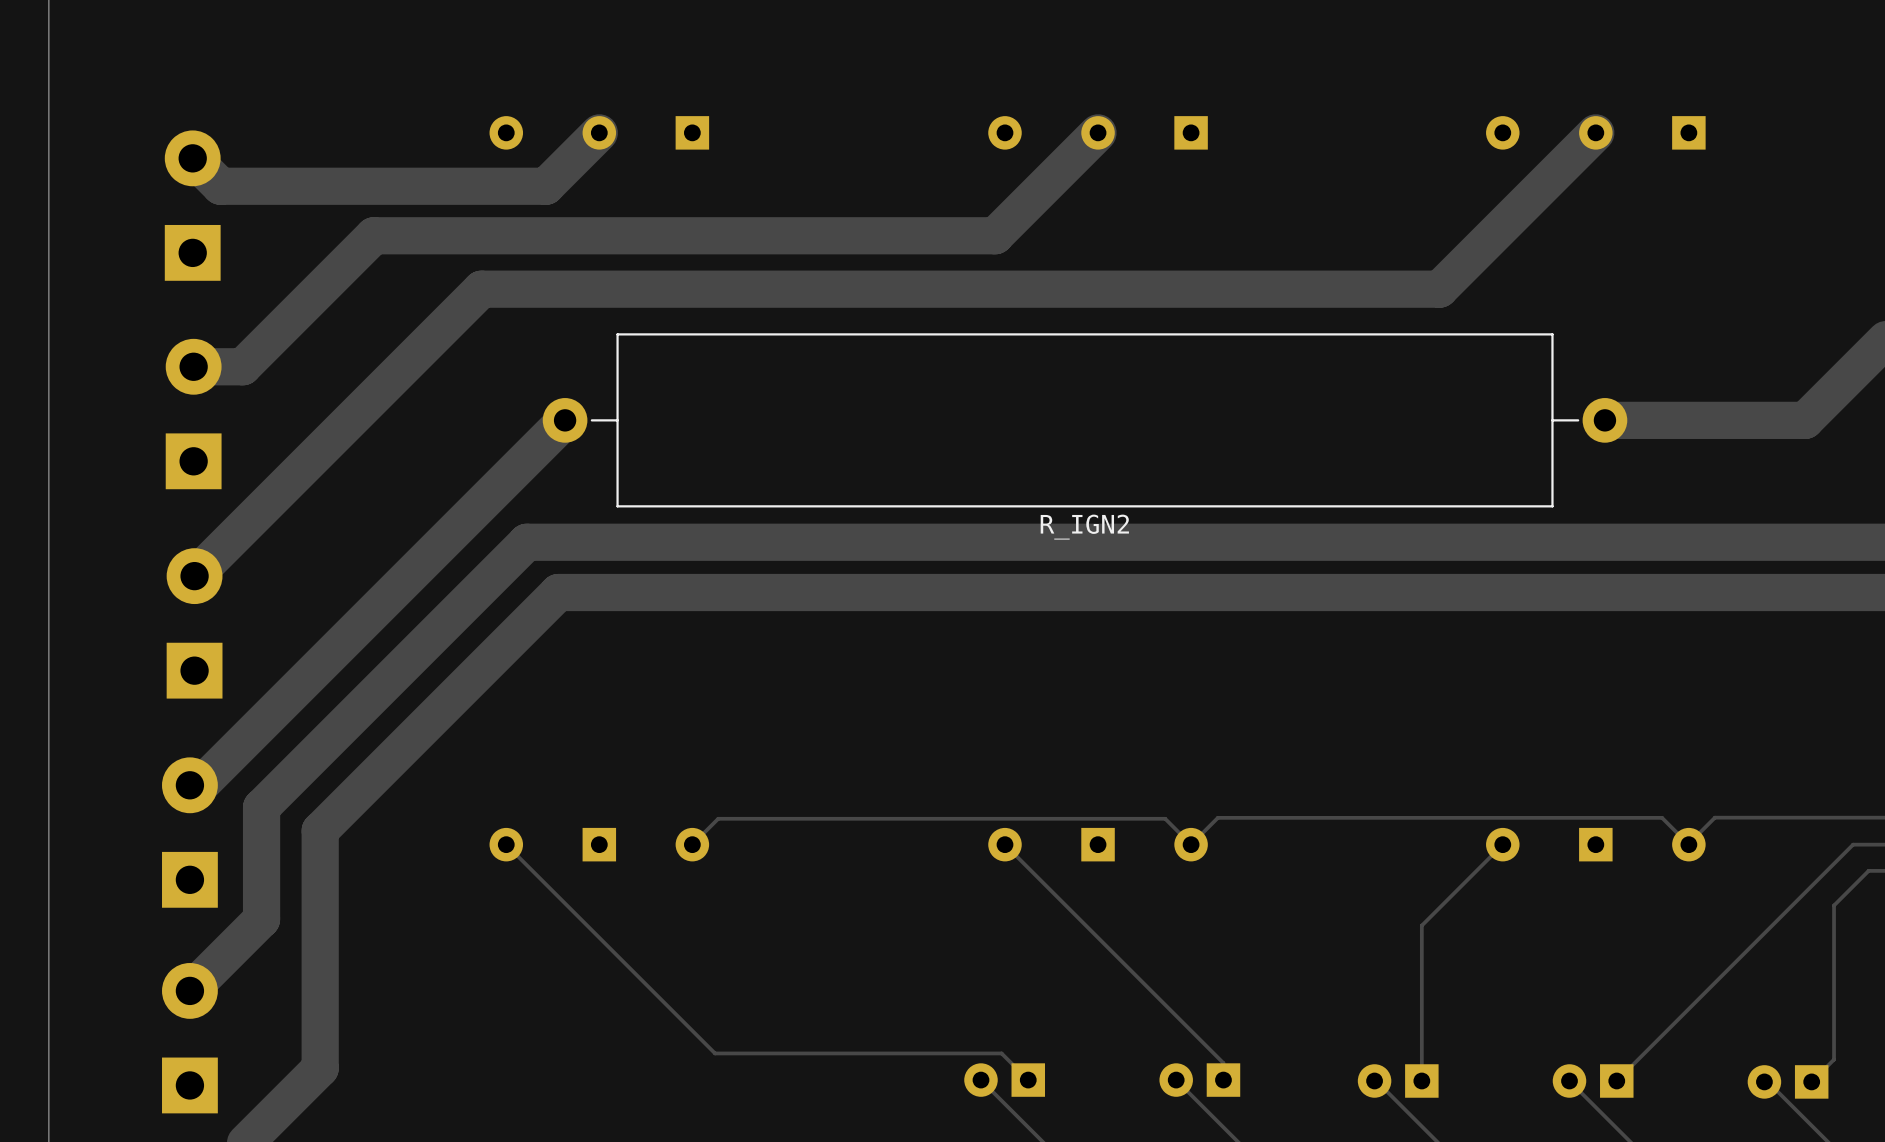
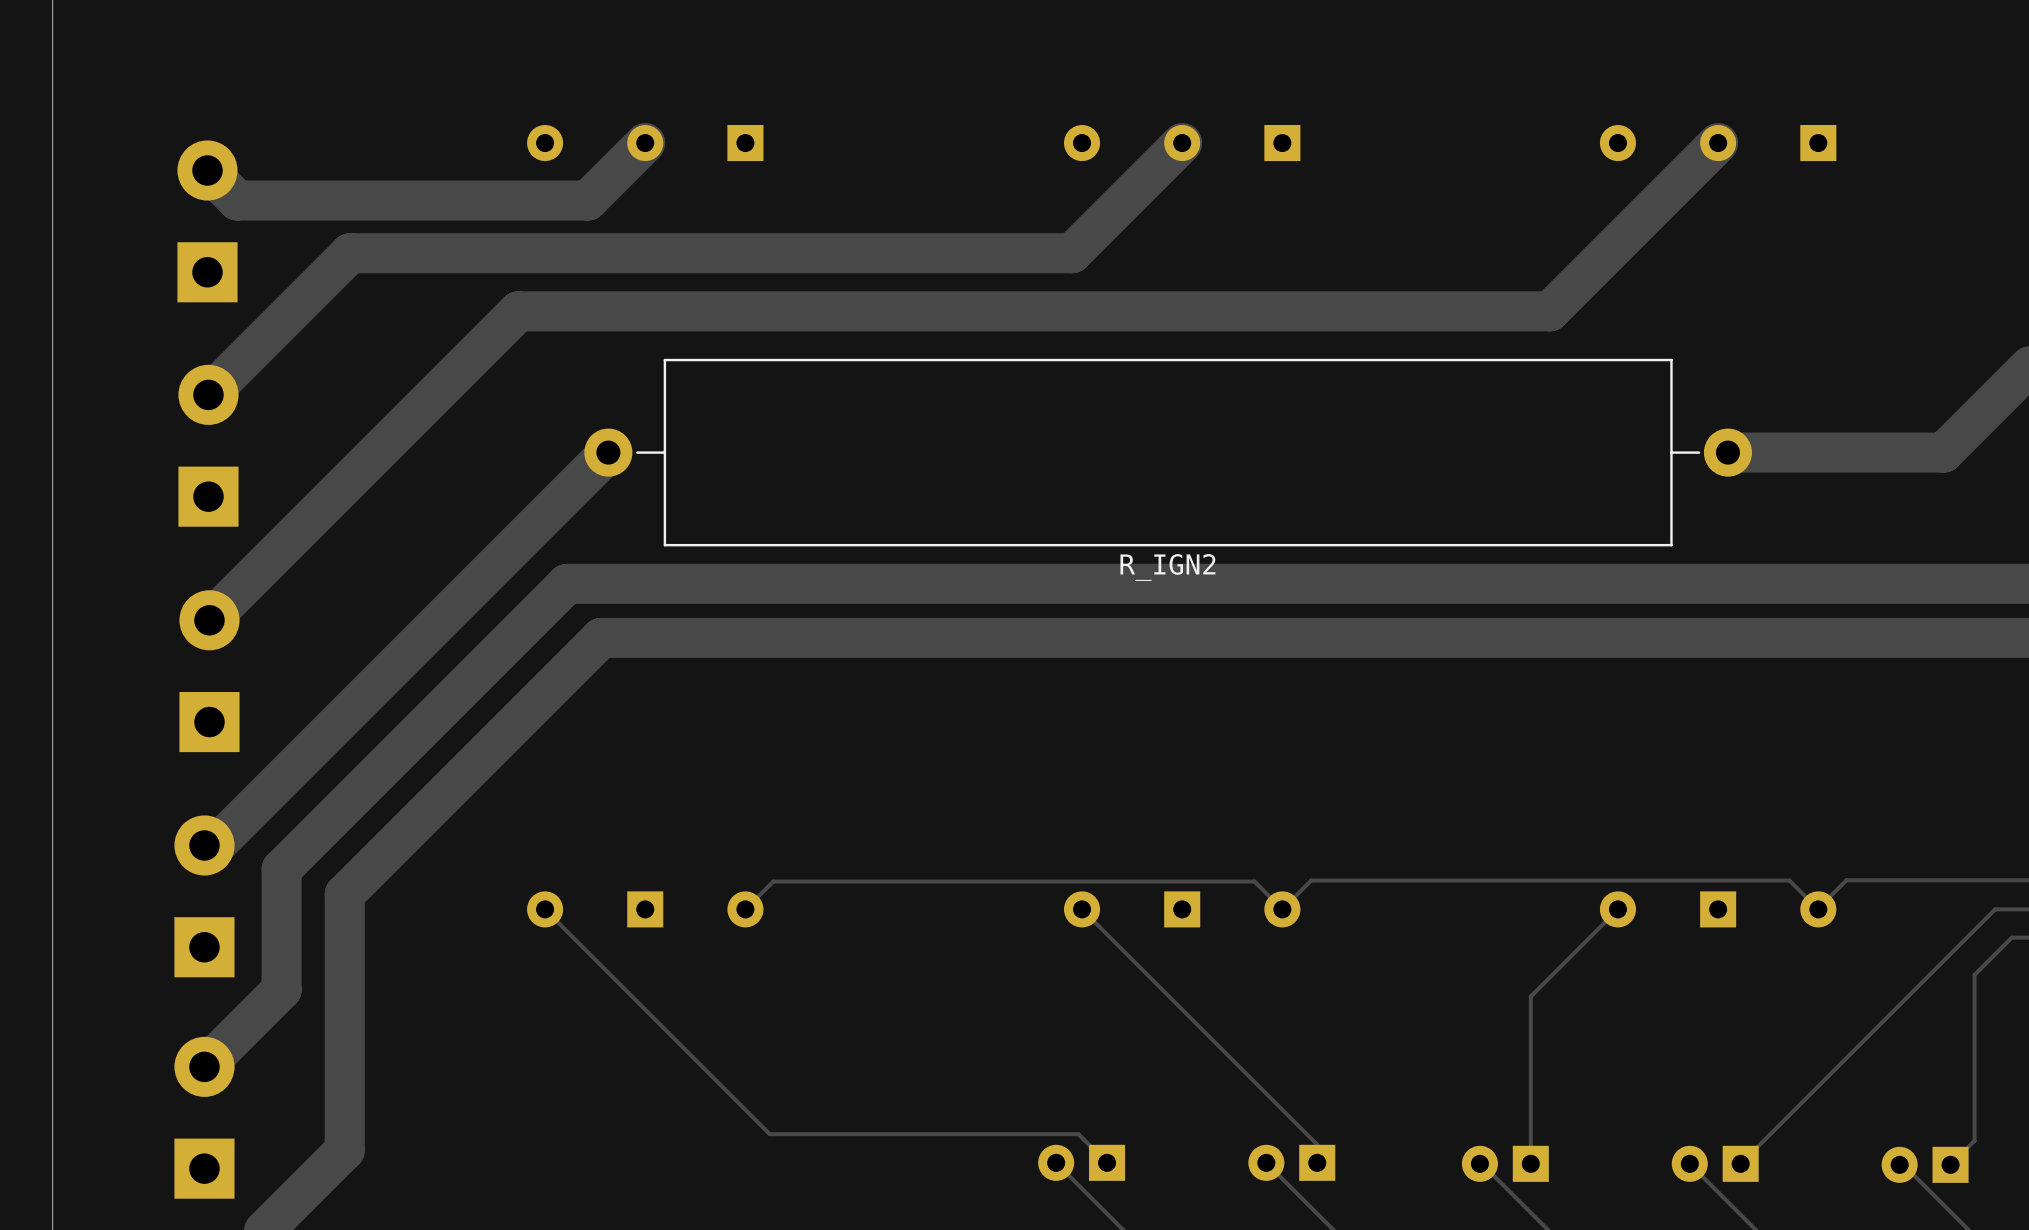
track: (995, 235) (373, 235) (242, 366) (193, 366) -> (1072, 253) (350, 253) (208, 394)

